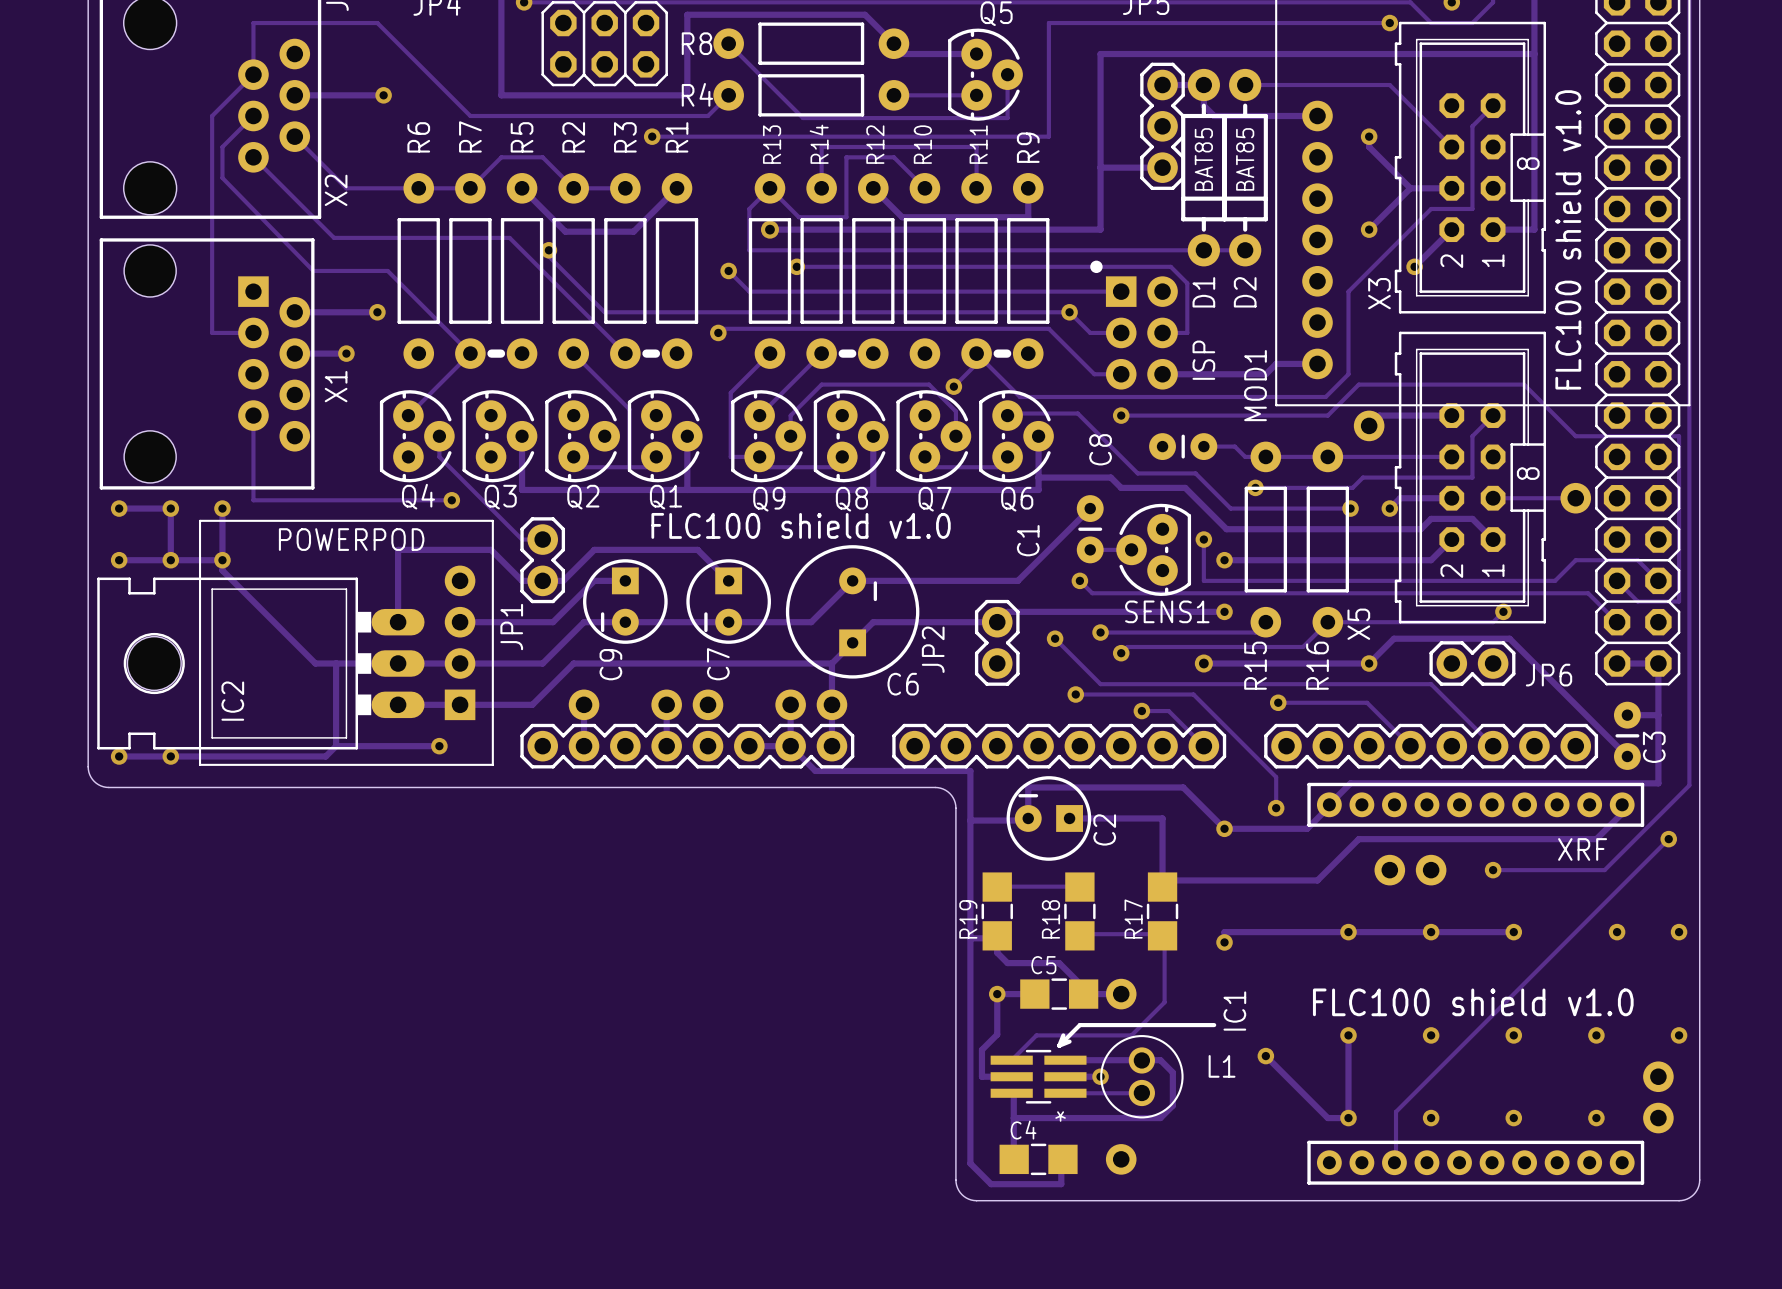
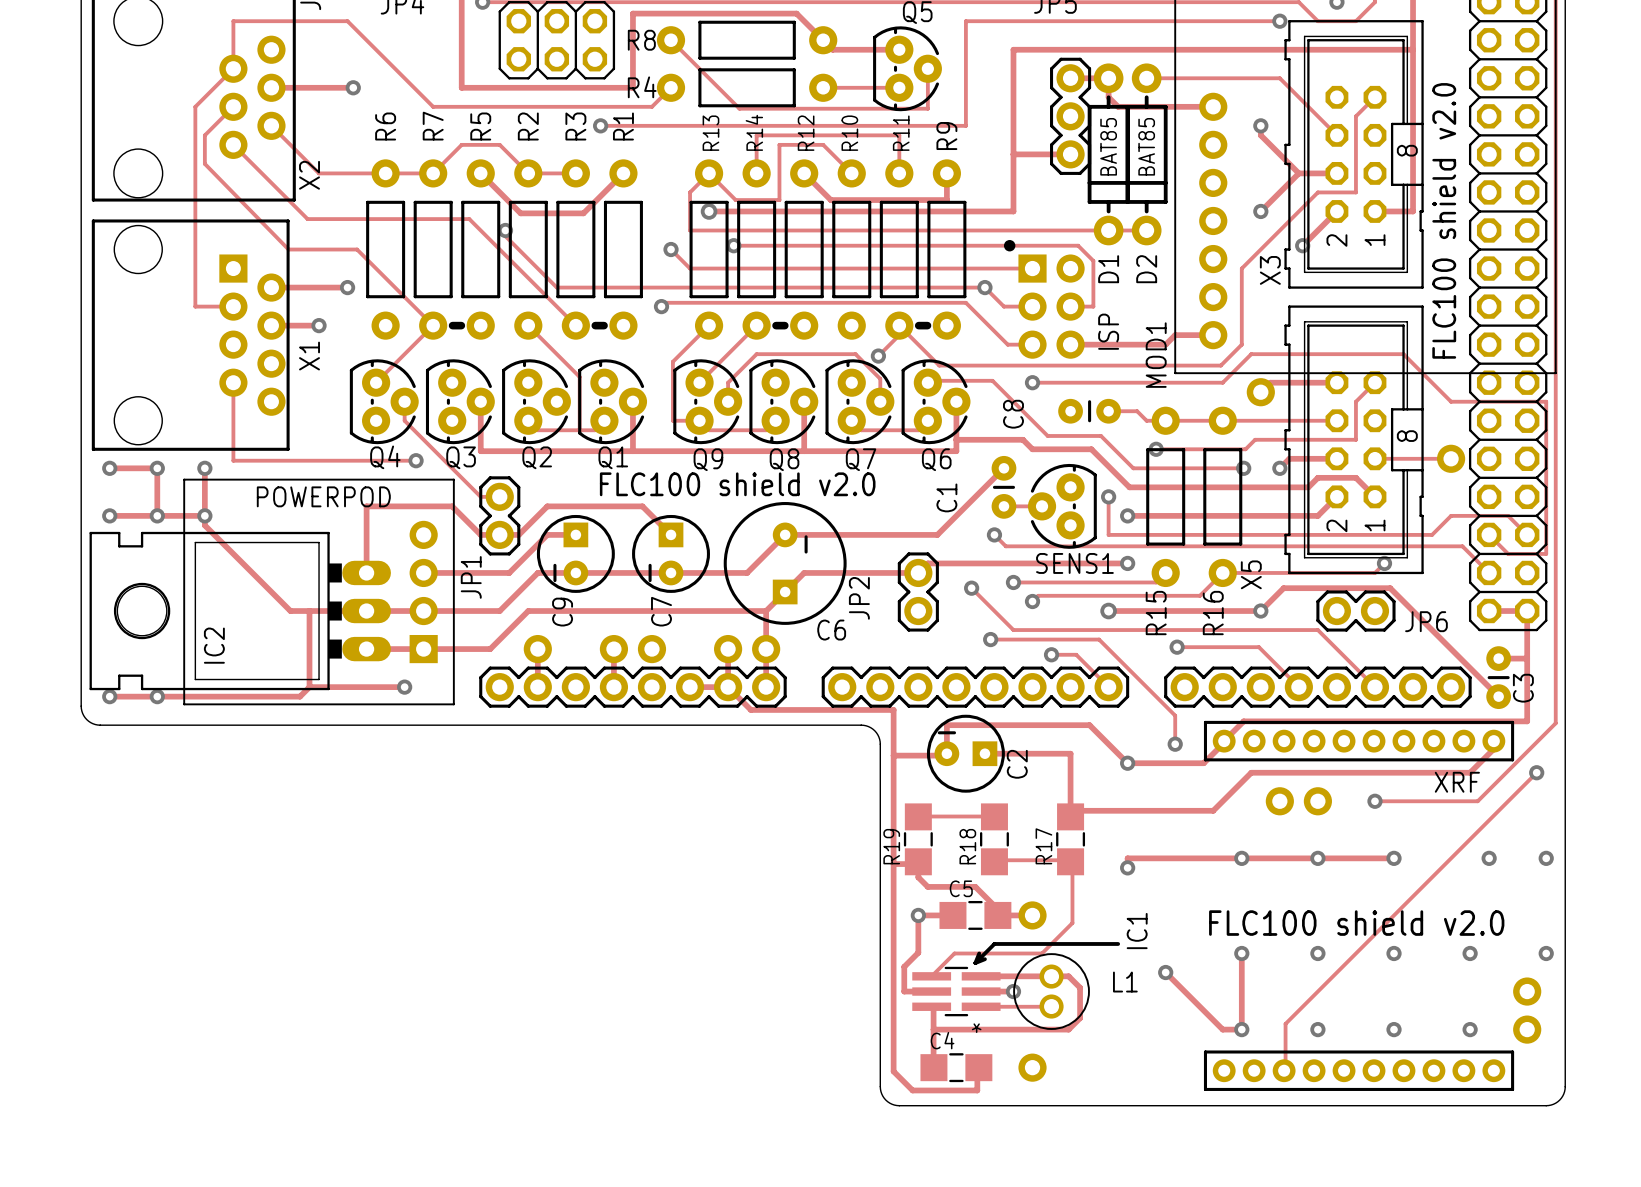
text: FLC100 shield v1.0 (1568, 239) -> FLC100 shield v2.0 (1444, 220)
text: FLC100 shield v1.0 (801, 525) -> FLC100 shield v2.0 (737, 484)
text: FLC100 shield v1.0 (1473, 1002) -> FLC100 shield v2.0 (1356, 923)

